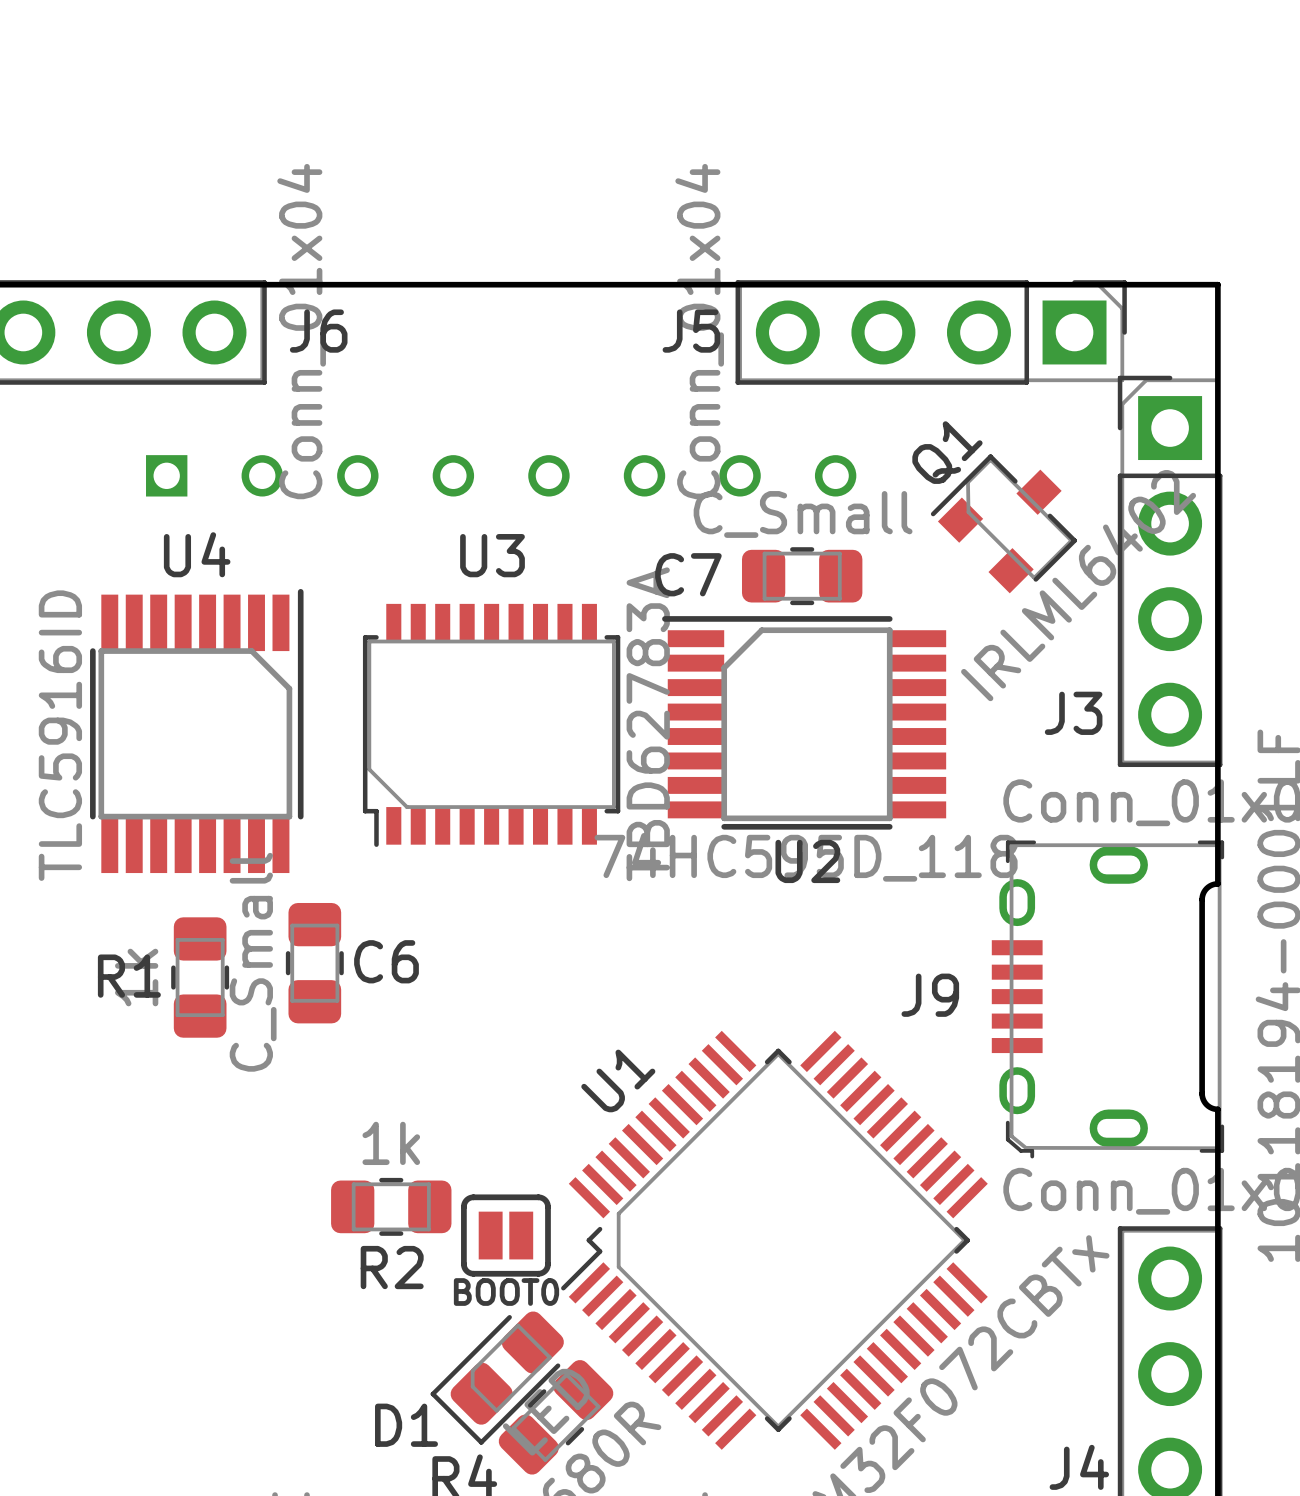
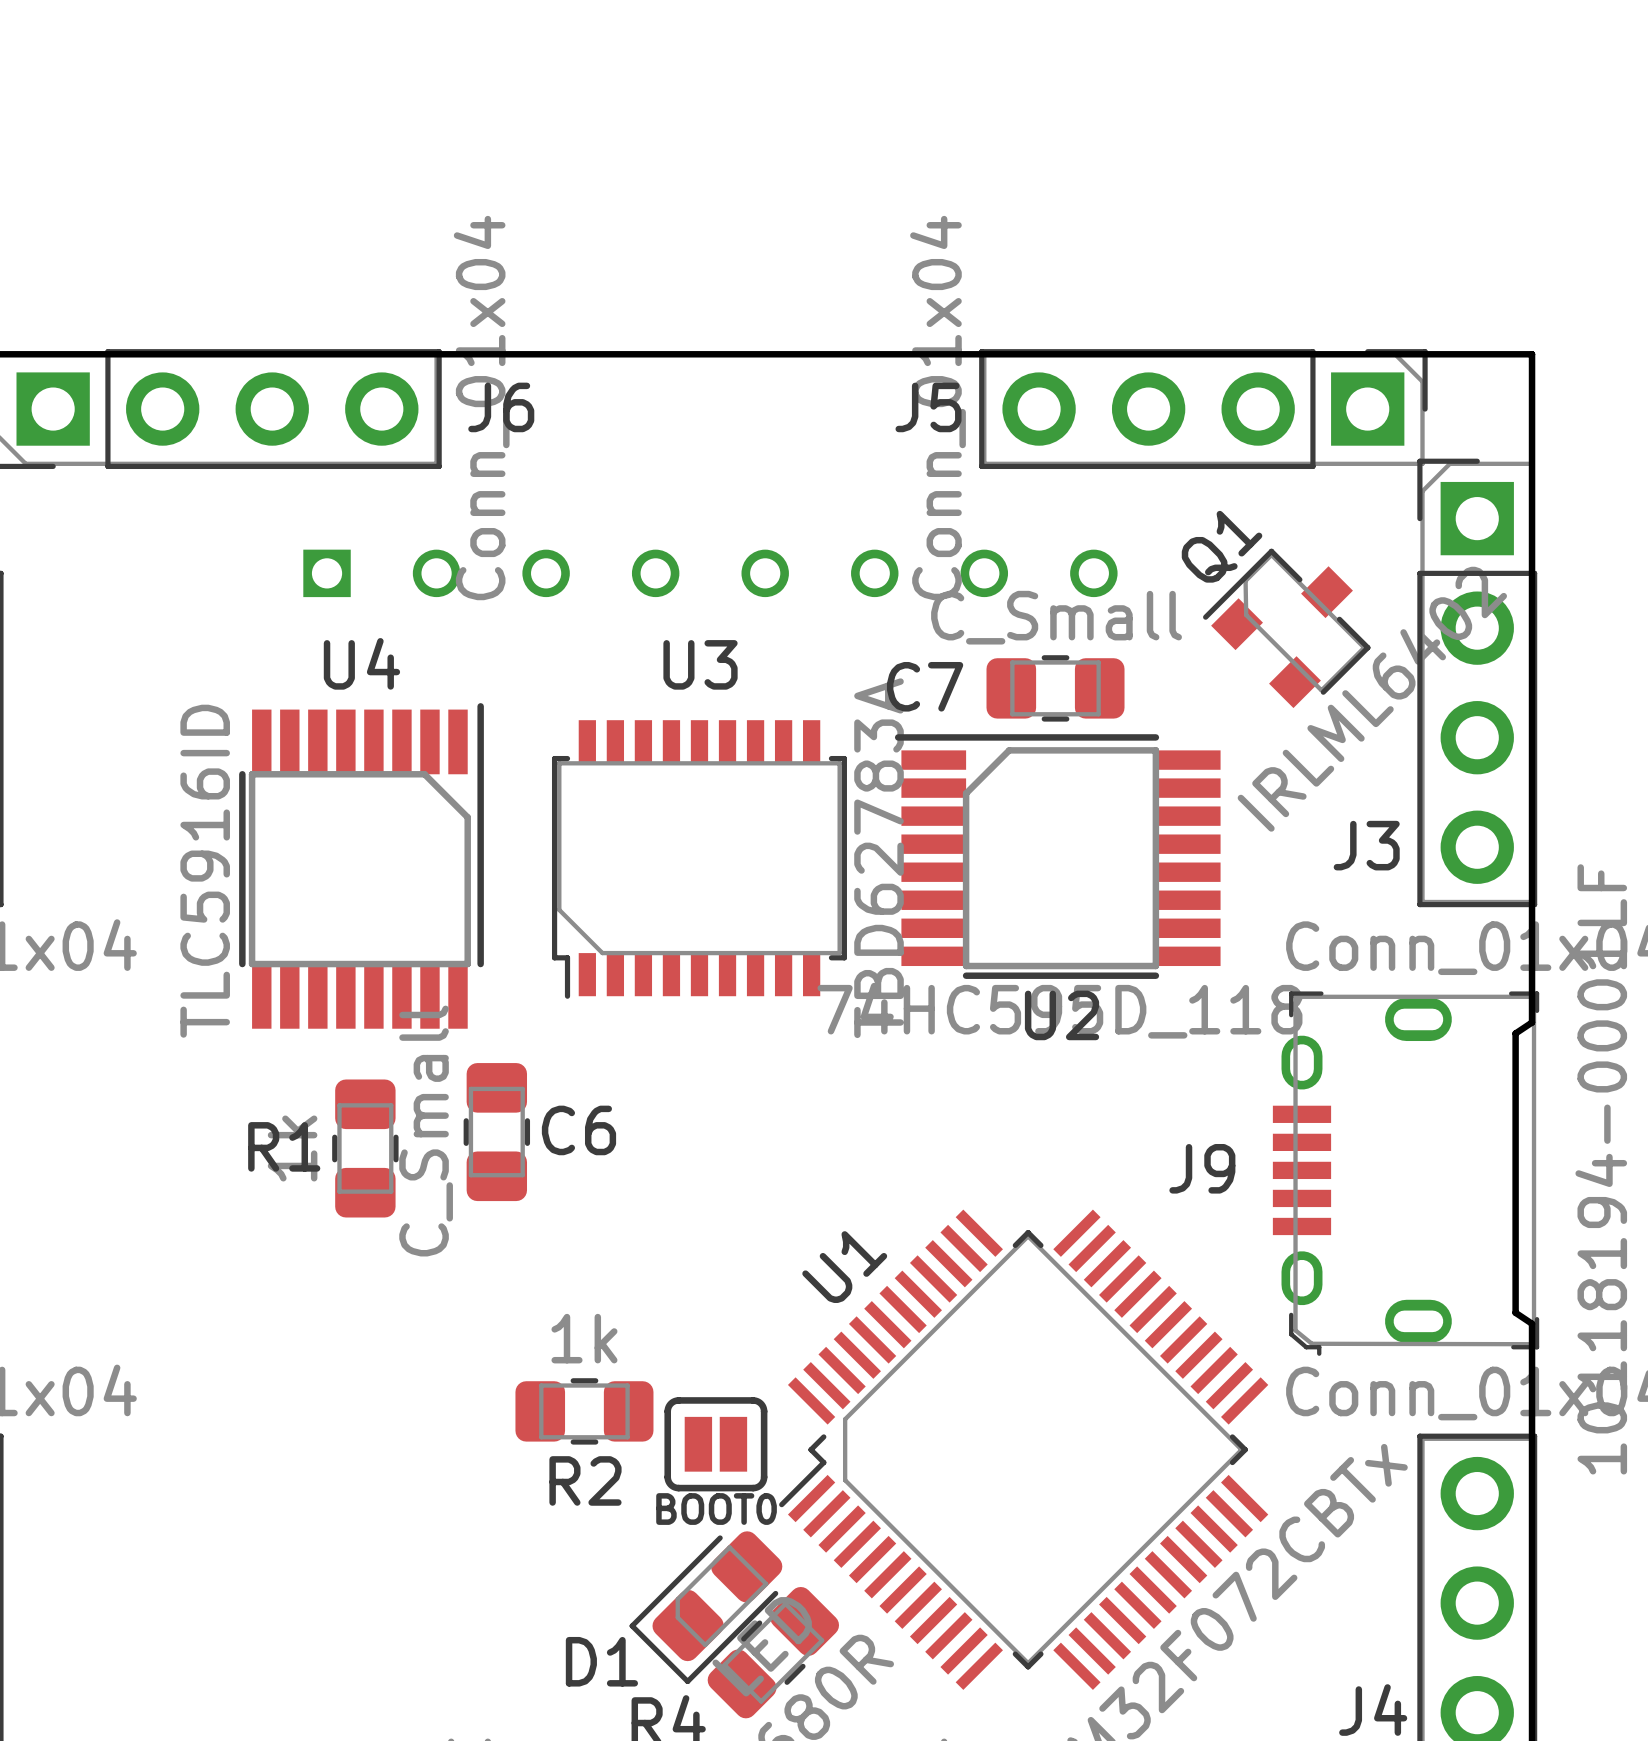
board edge: (1217, 867) (1217, 883) (1208, 887) (1202, 897) (1202, 1094) -> (1532, 1022) (1515, 1033) (1515, 1312) (1532, 1323)
board edge: (1202, 1093) (1206, 1104) (1217, 1109) (1217, 1130) -> none

